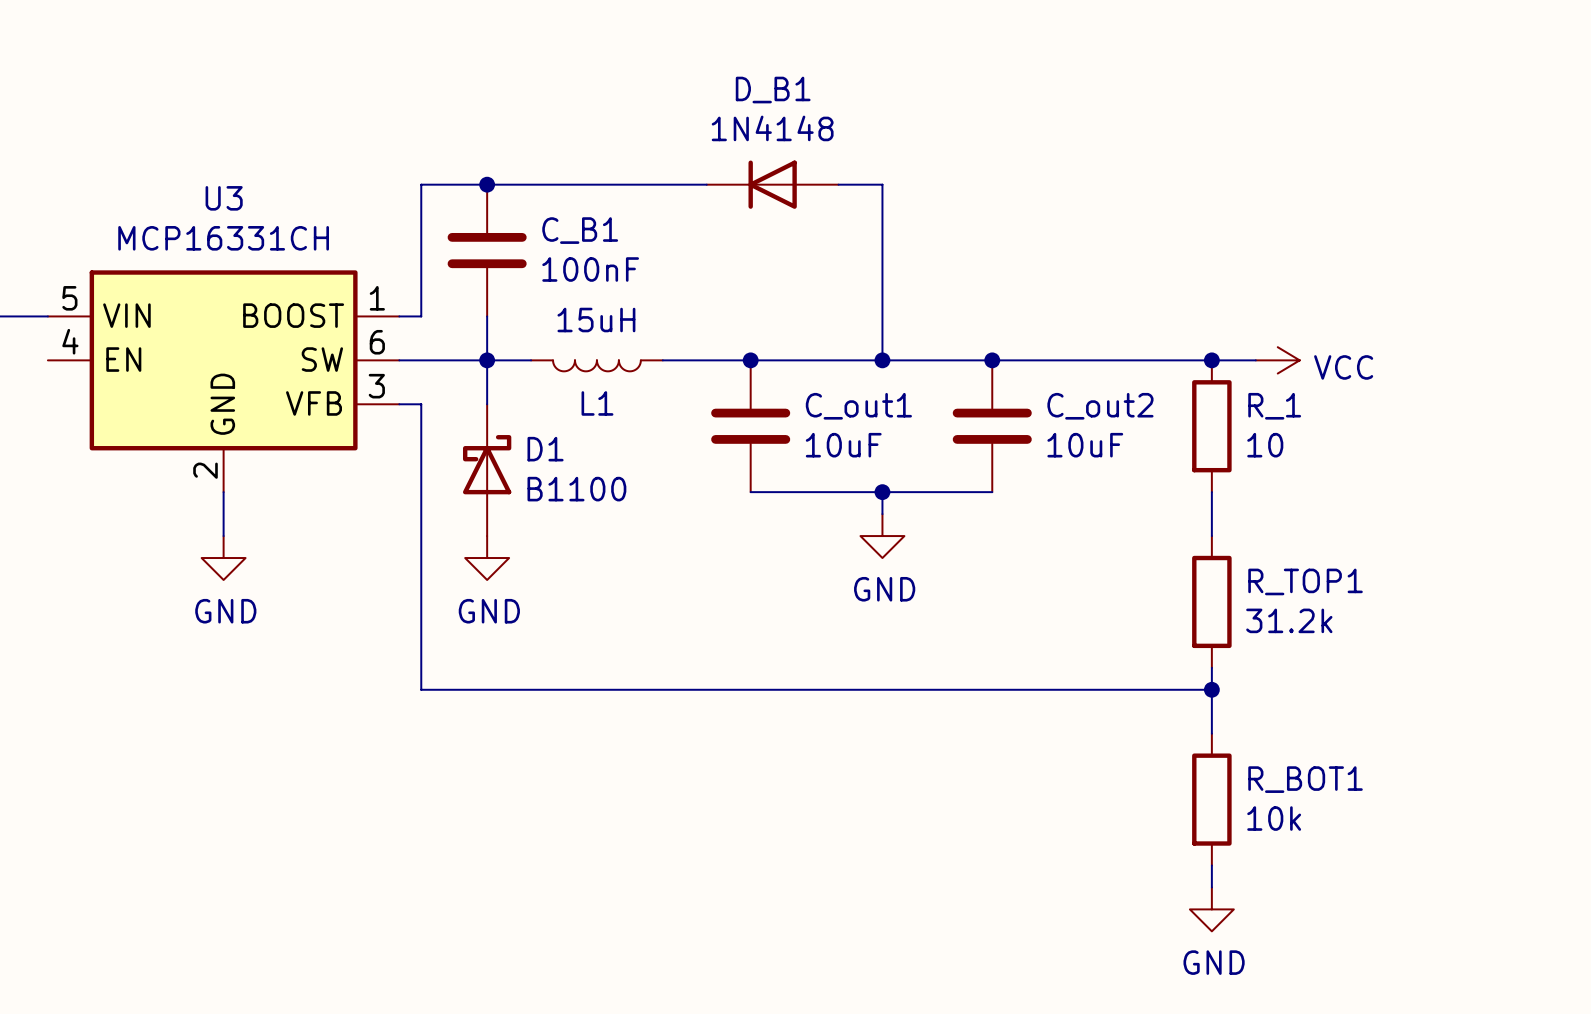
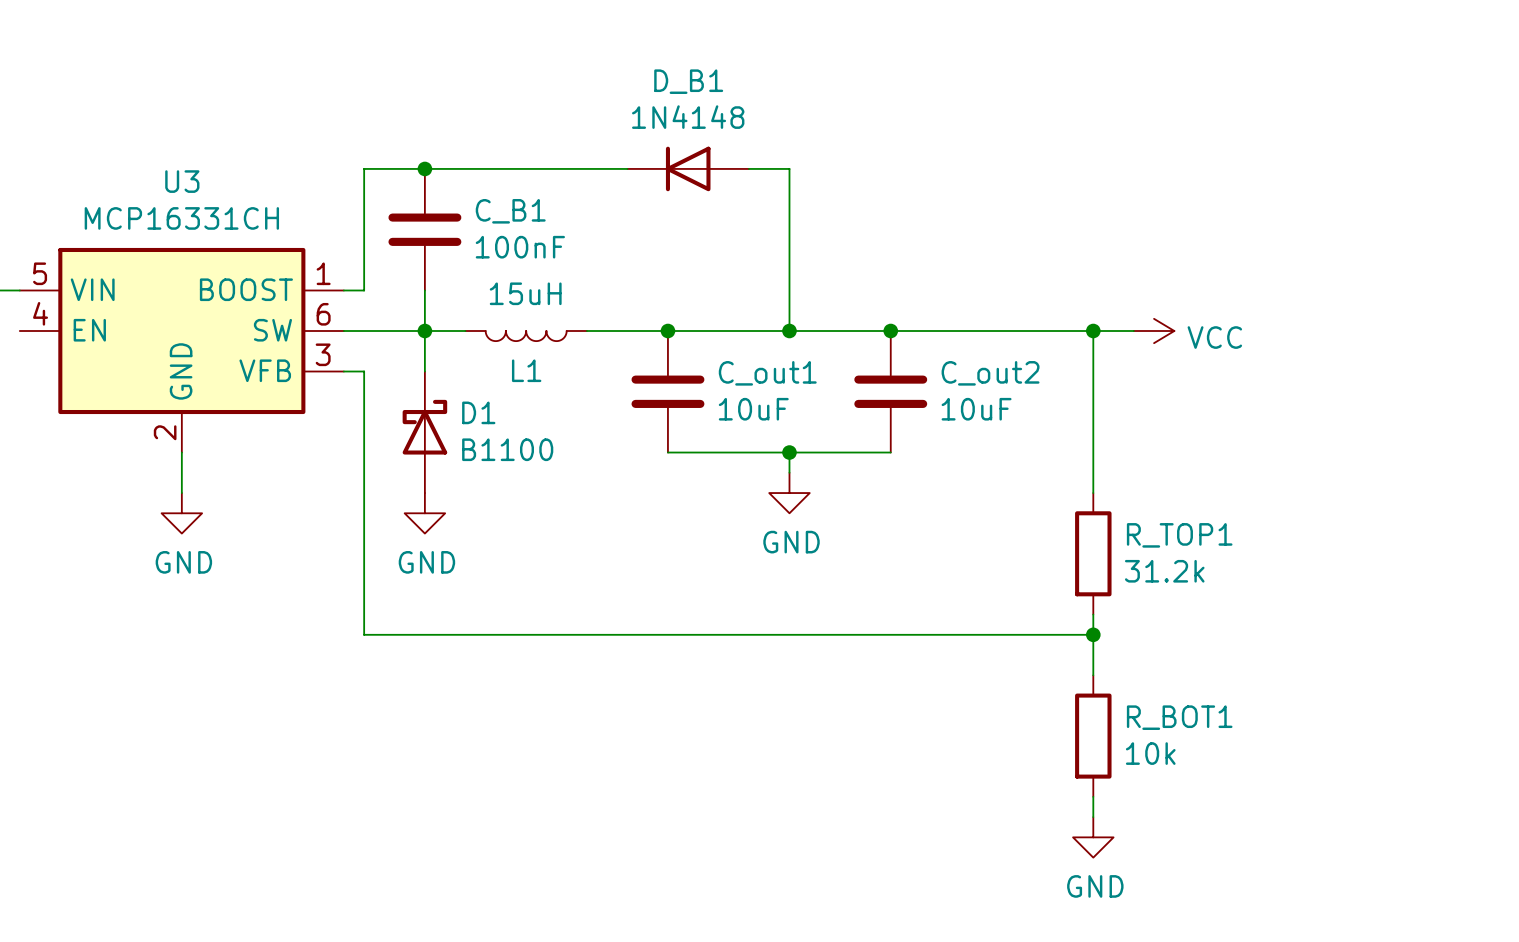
wire: none -> (1093, 331) (1093, 452)
R_1: 10 (1211, 426) -> none

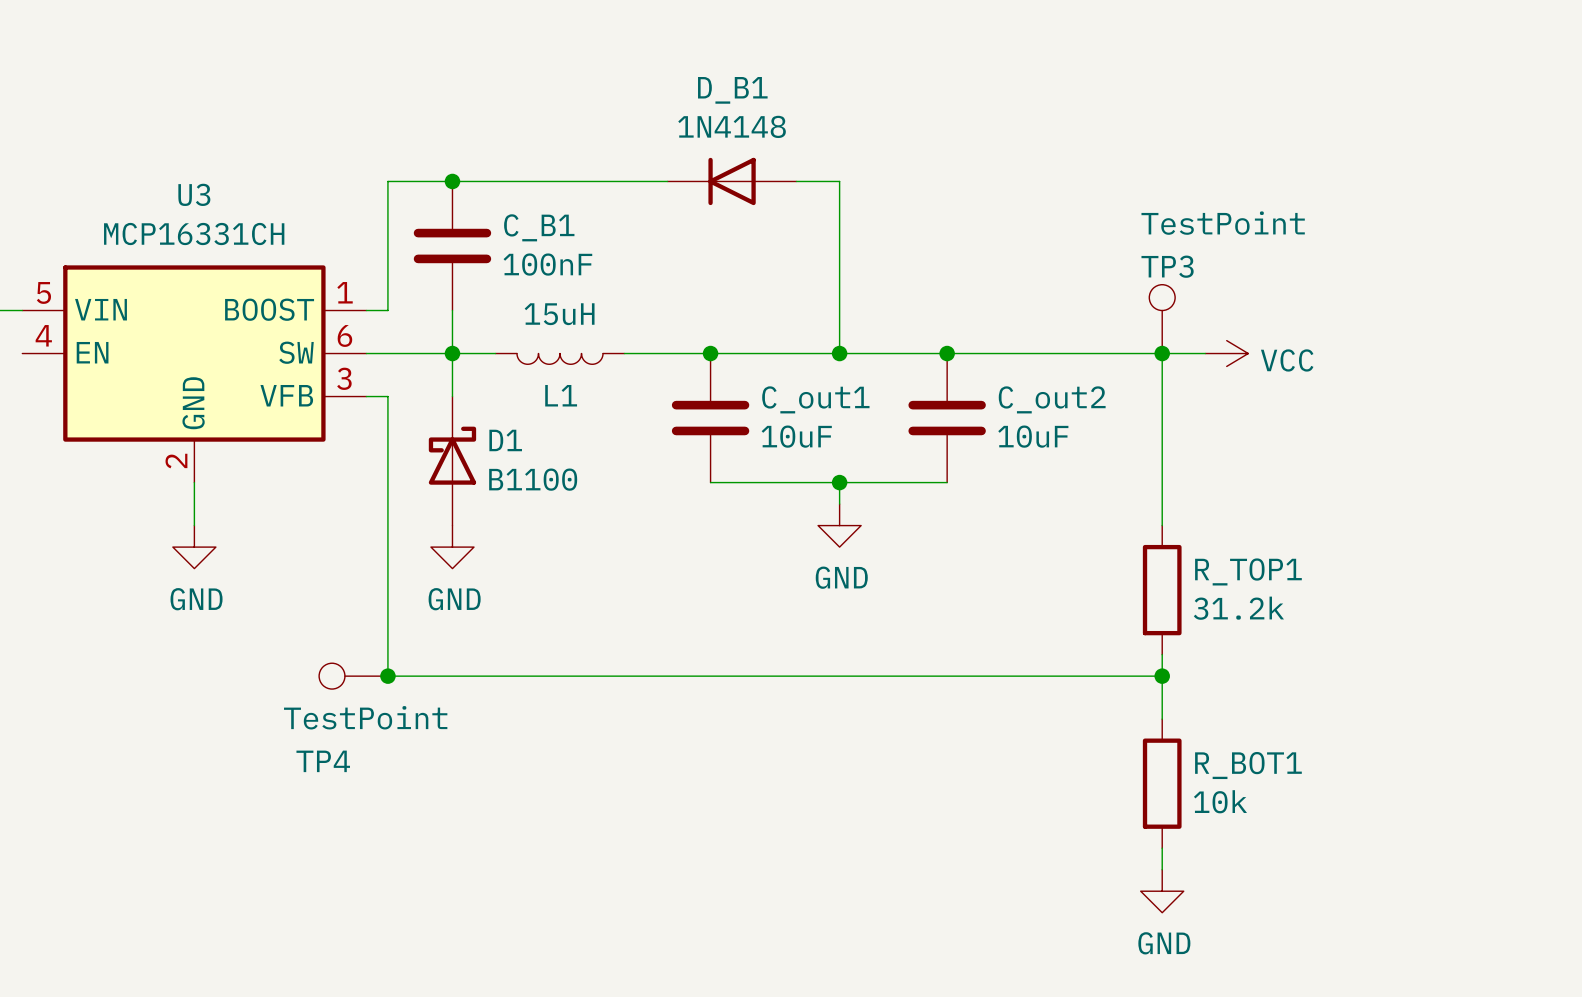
TP3: none -> TestPoint (1162, 319)
TP4: none -> TestPoint (353, 676)
junction: none -> (387, 676)

